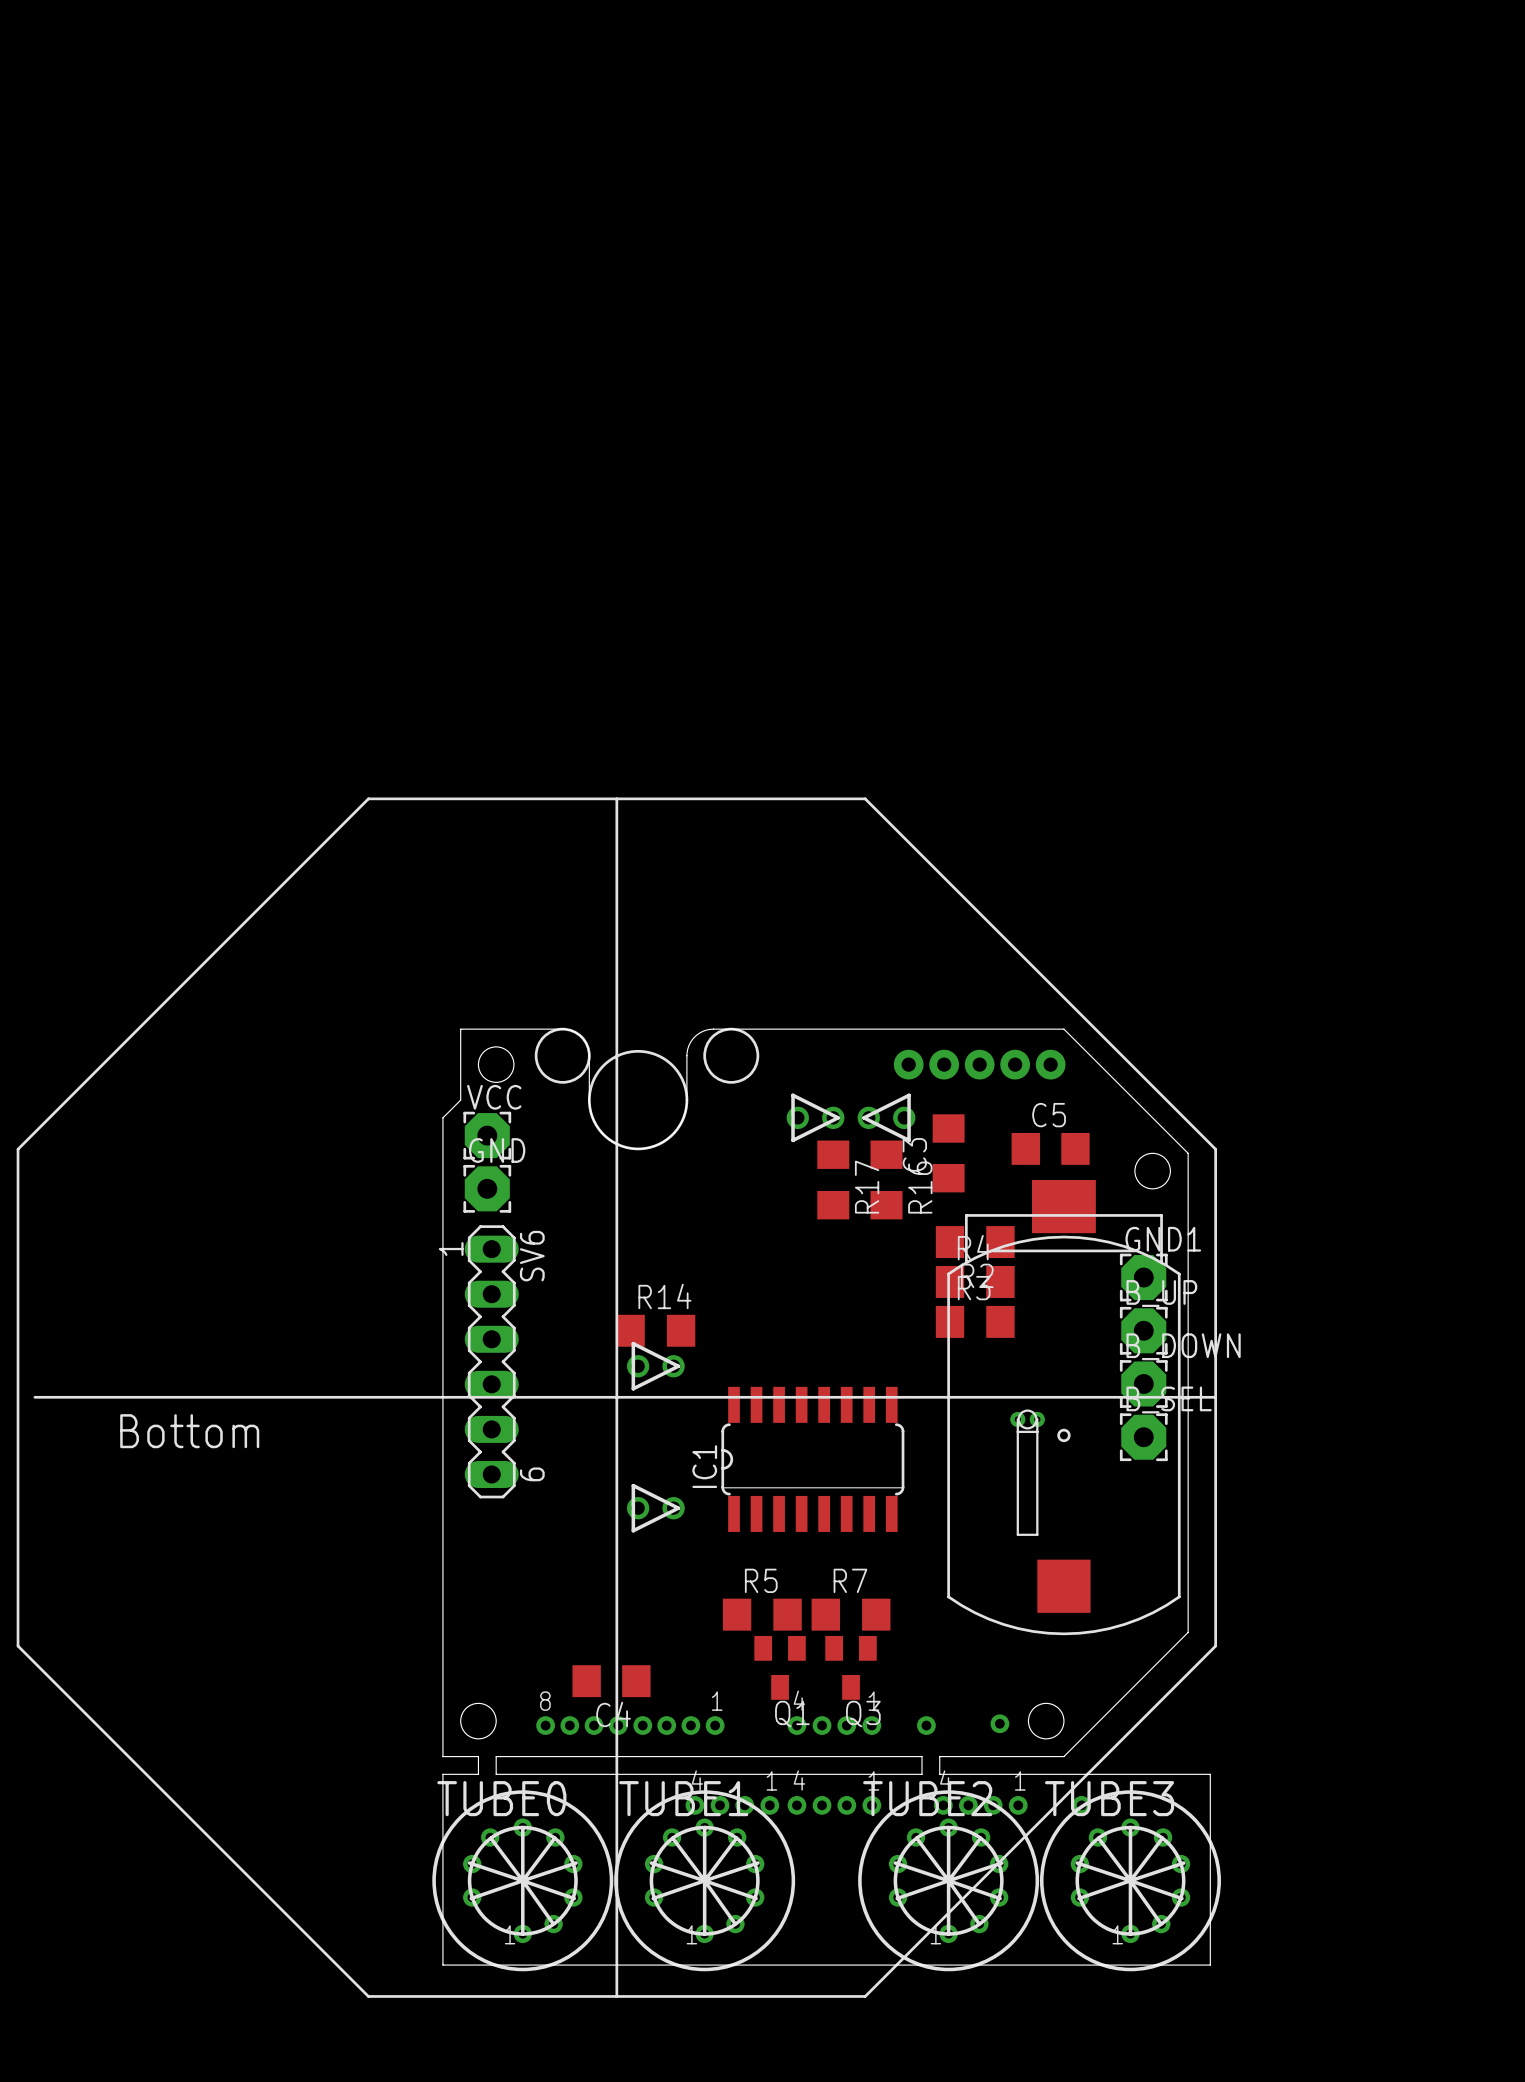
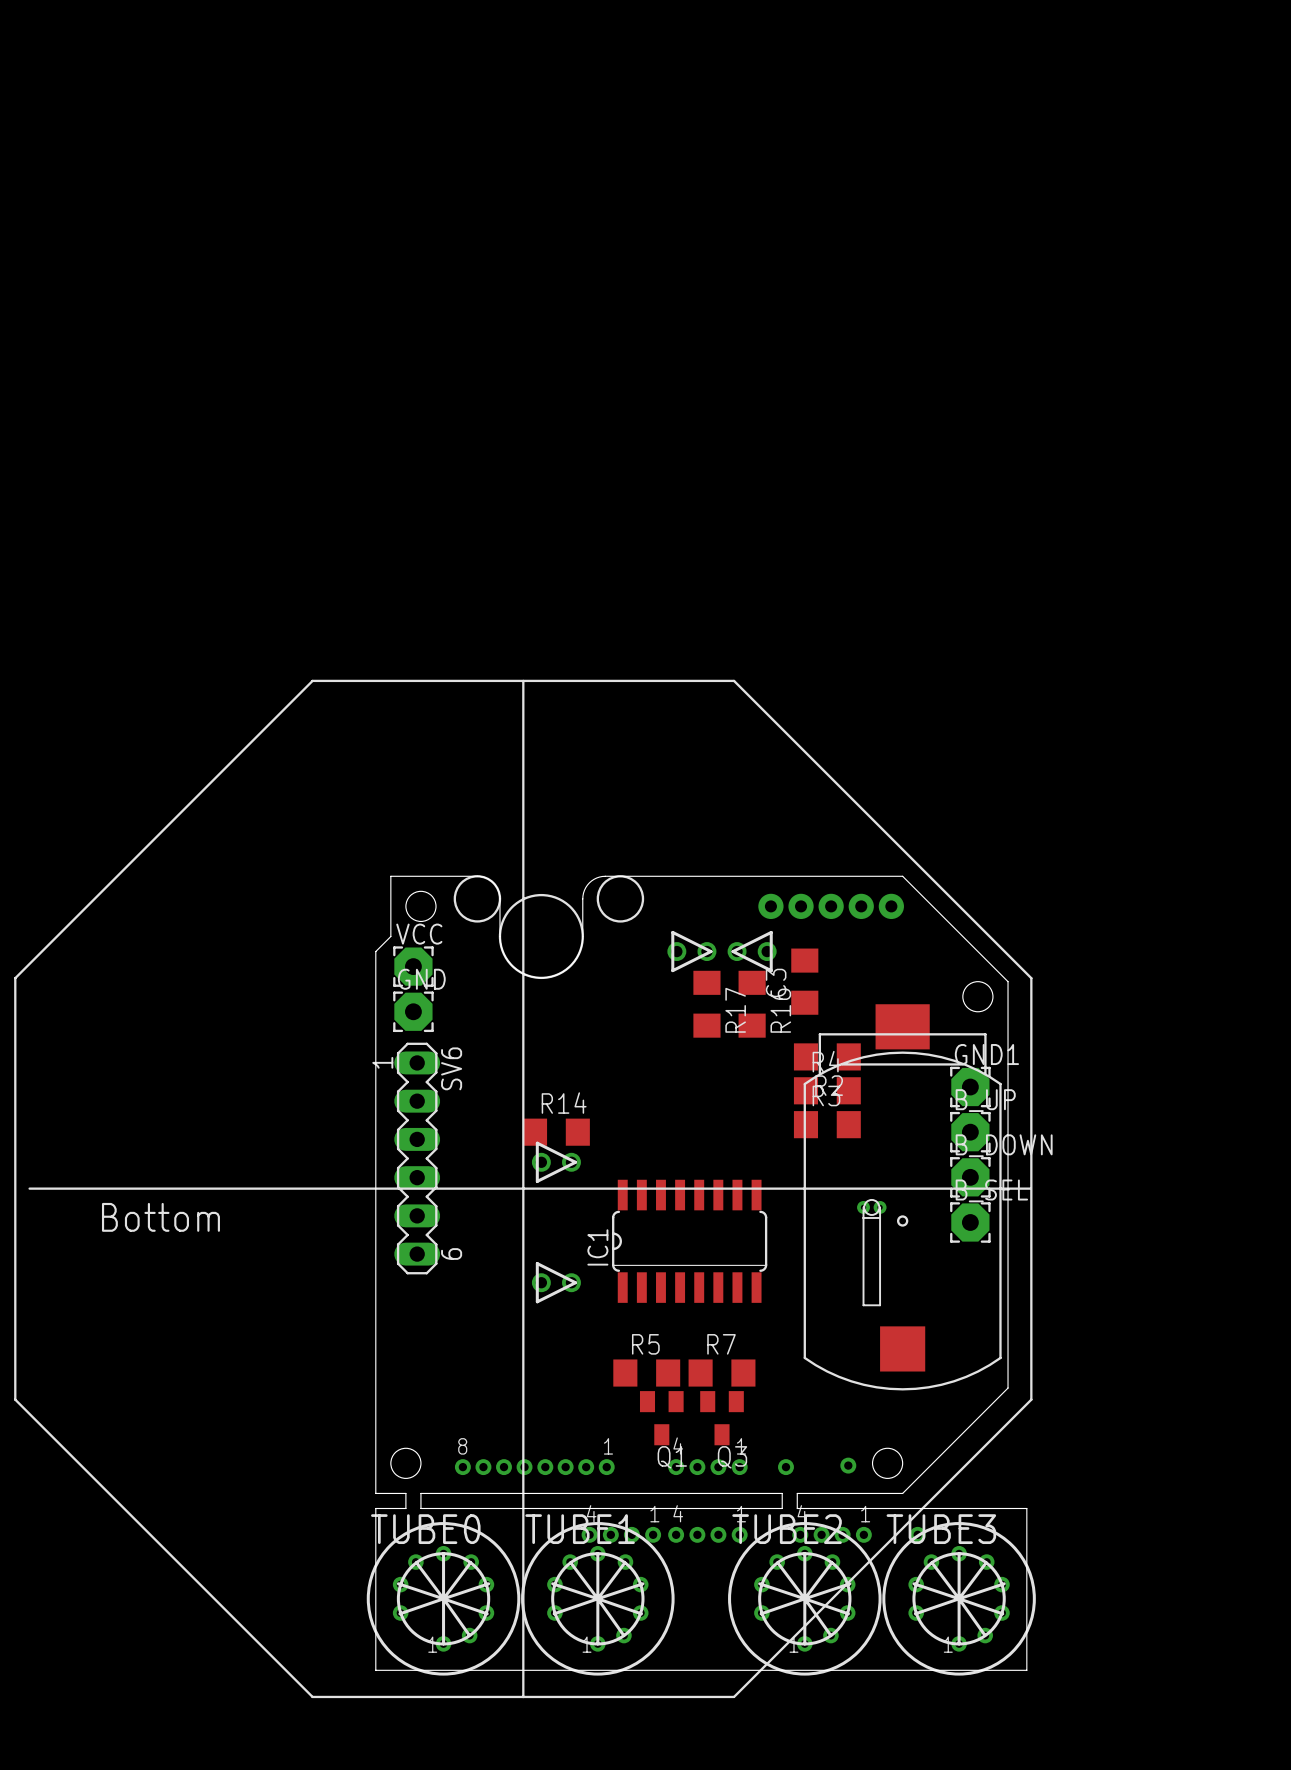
C5: (1050, 1148) -> none
C4: (611, 1681) -> none

